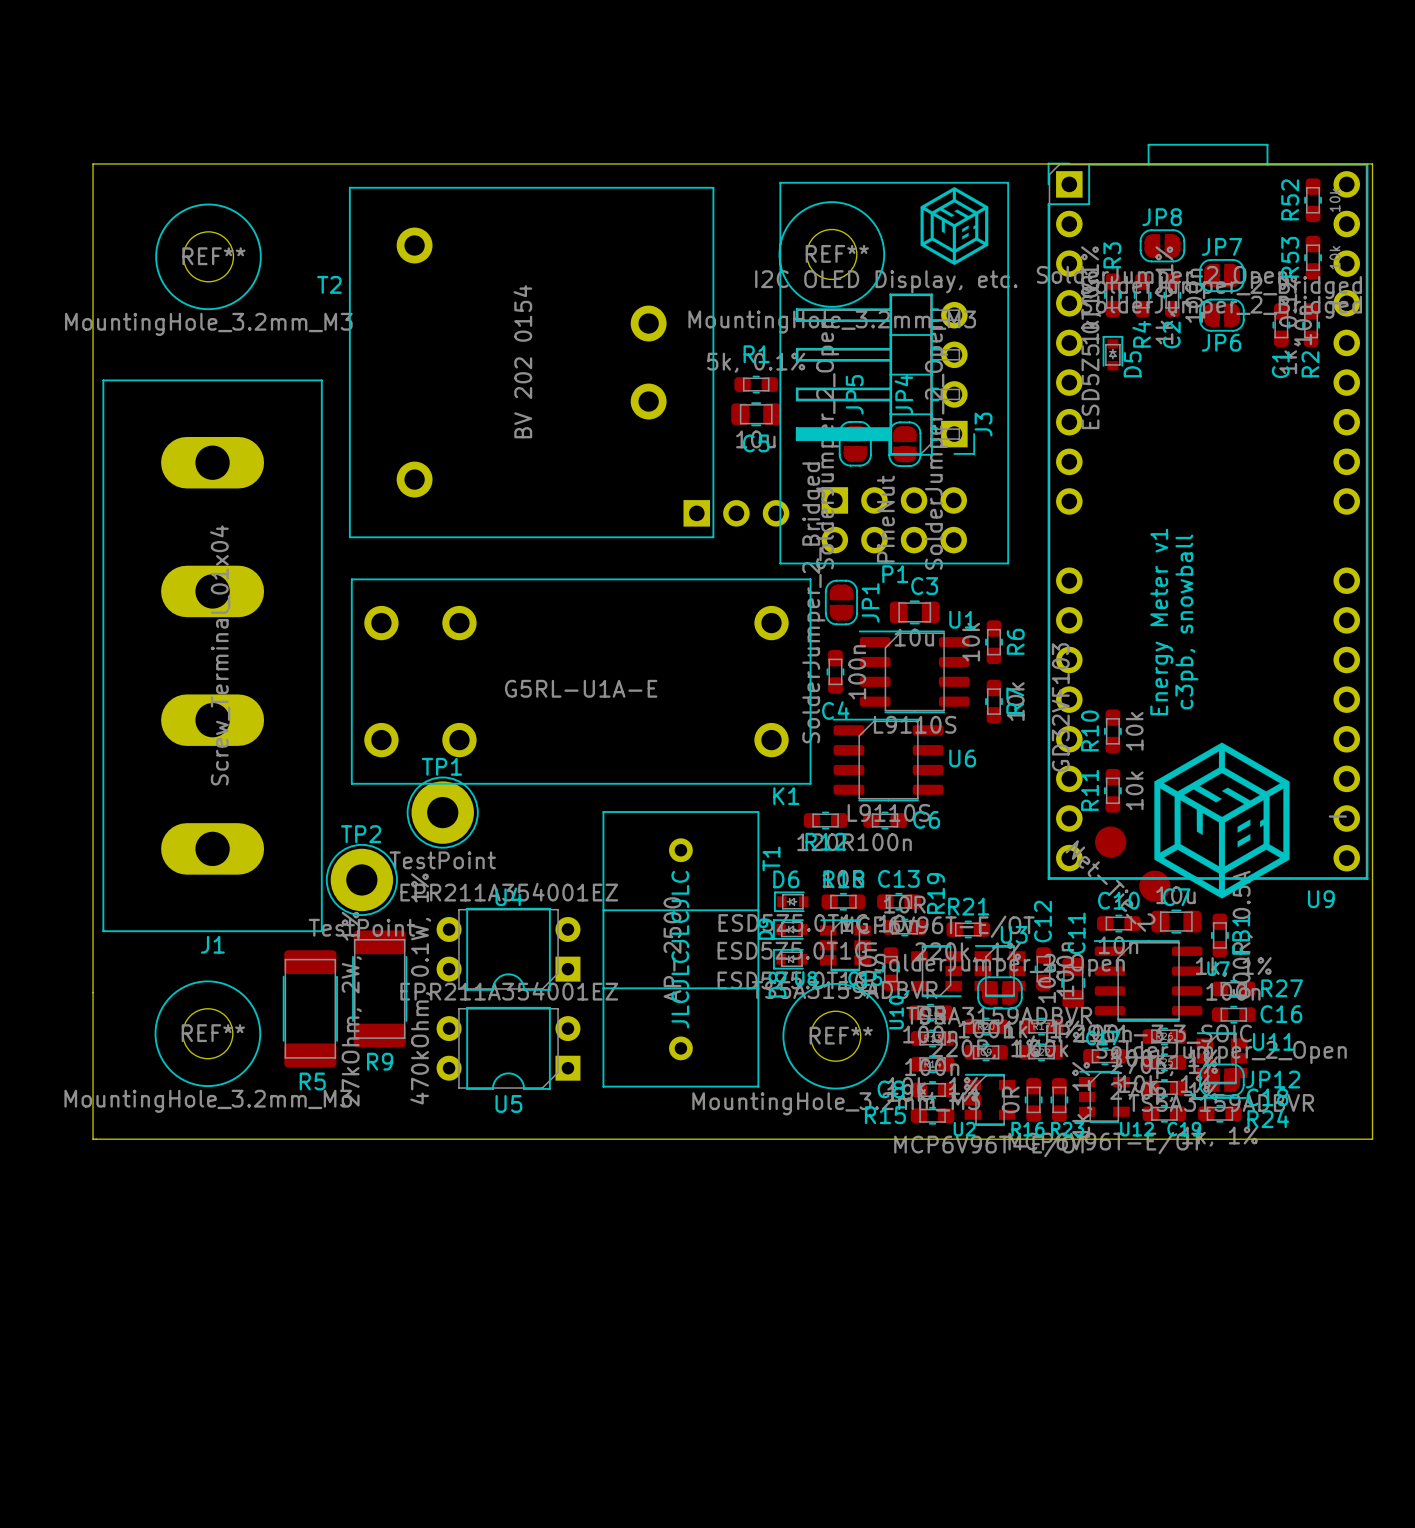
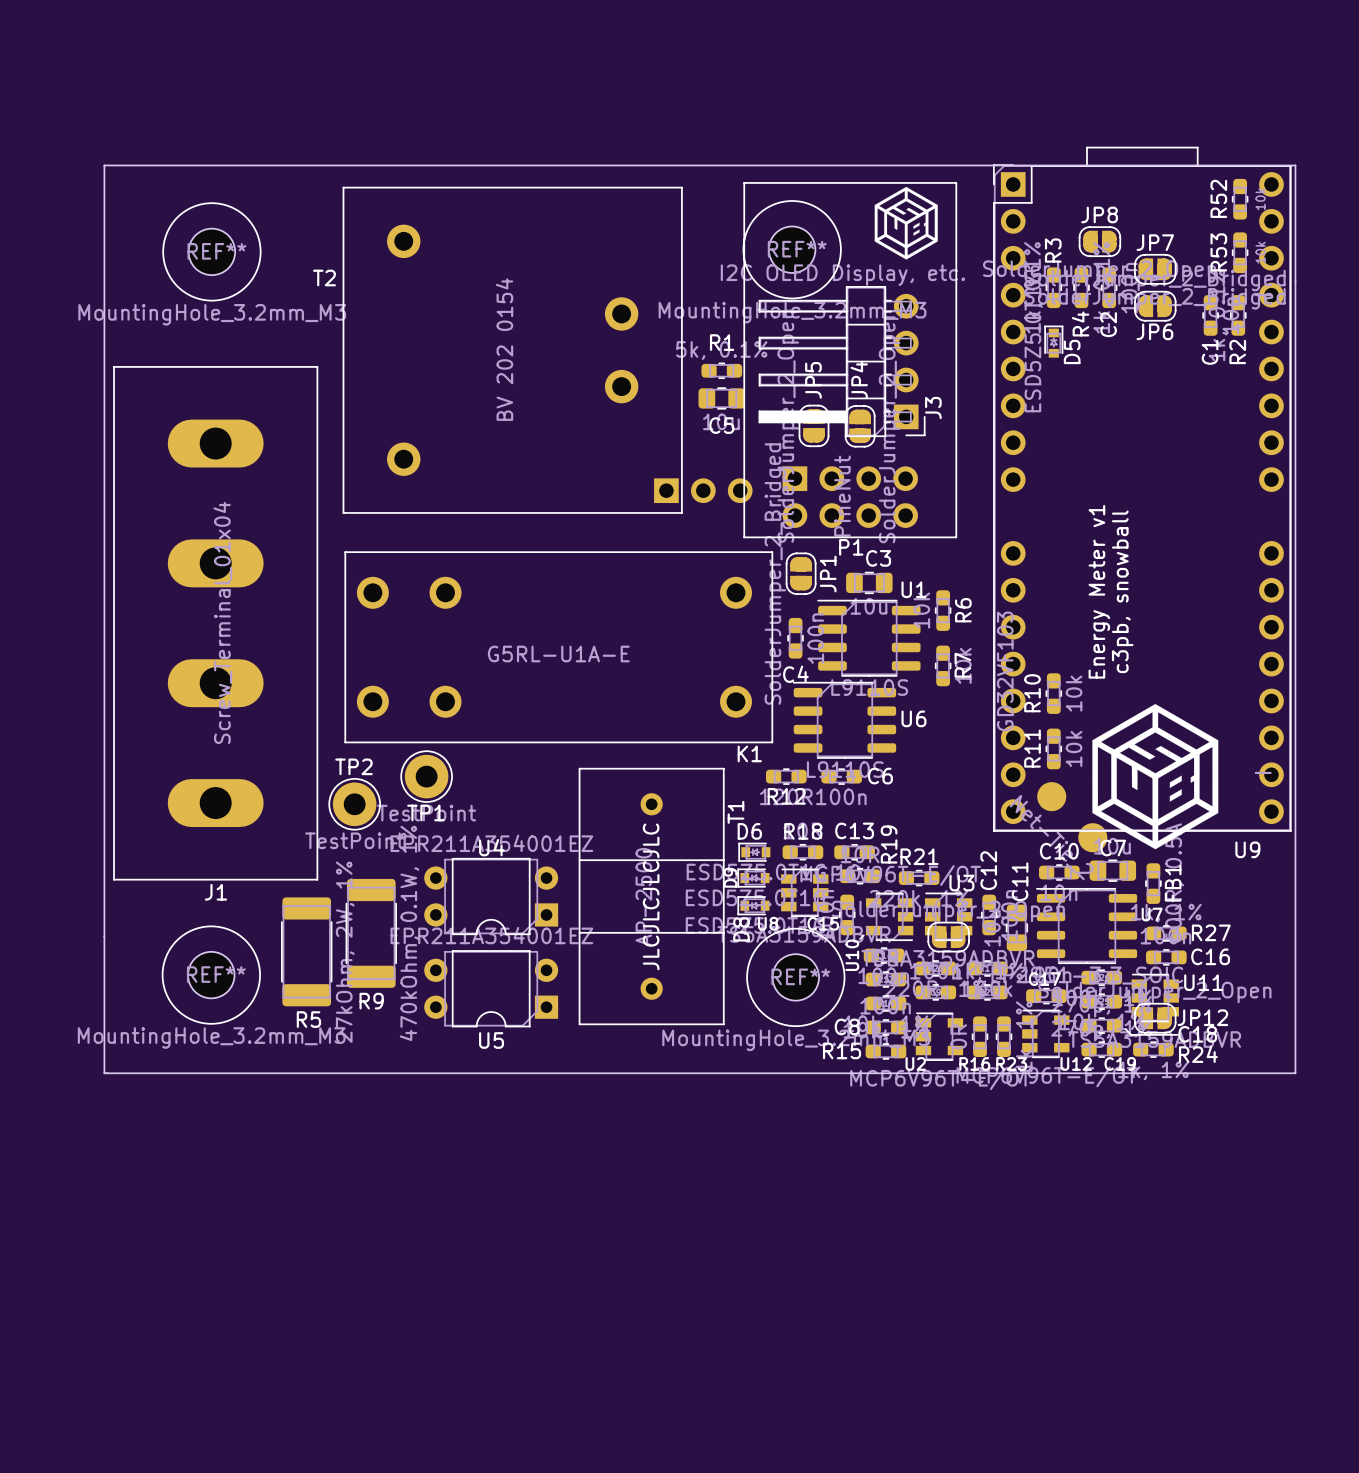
TP1 name position: TP1 (441, 766) -> TP1 (425, 812)
TP1 footprint: [406, 776, 479, 849] -> [400, 750, 453, 803]
TP2 footprint: [325, 843, 398, 916] -> [328, 777, 381, 831]

